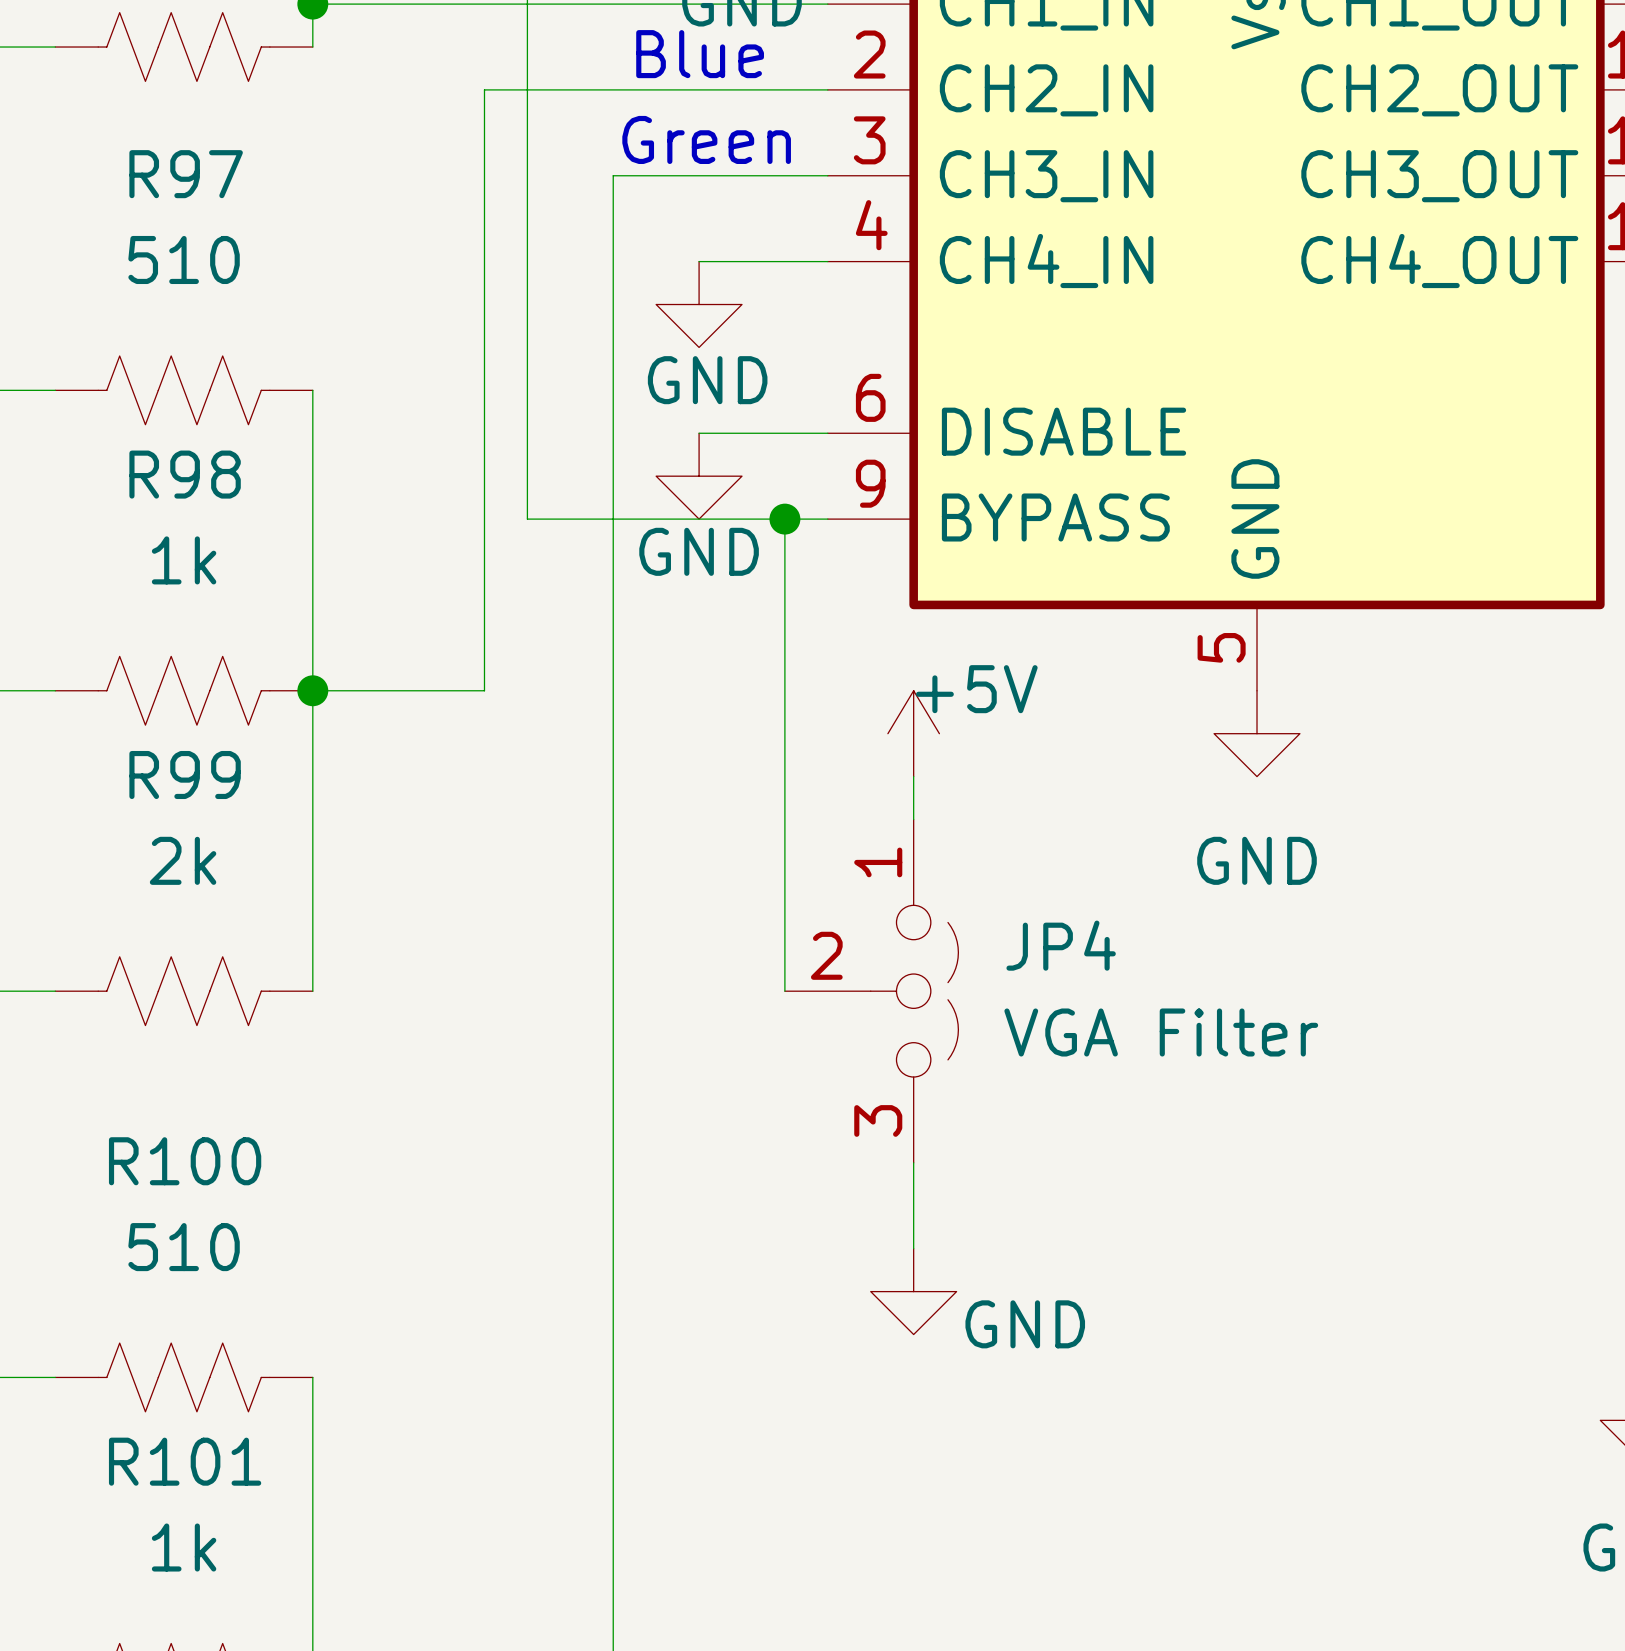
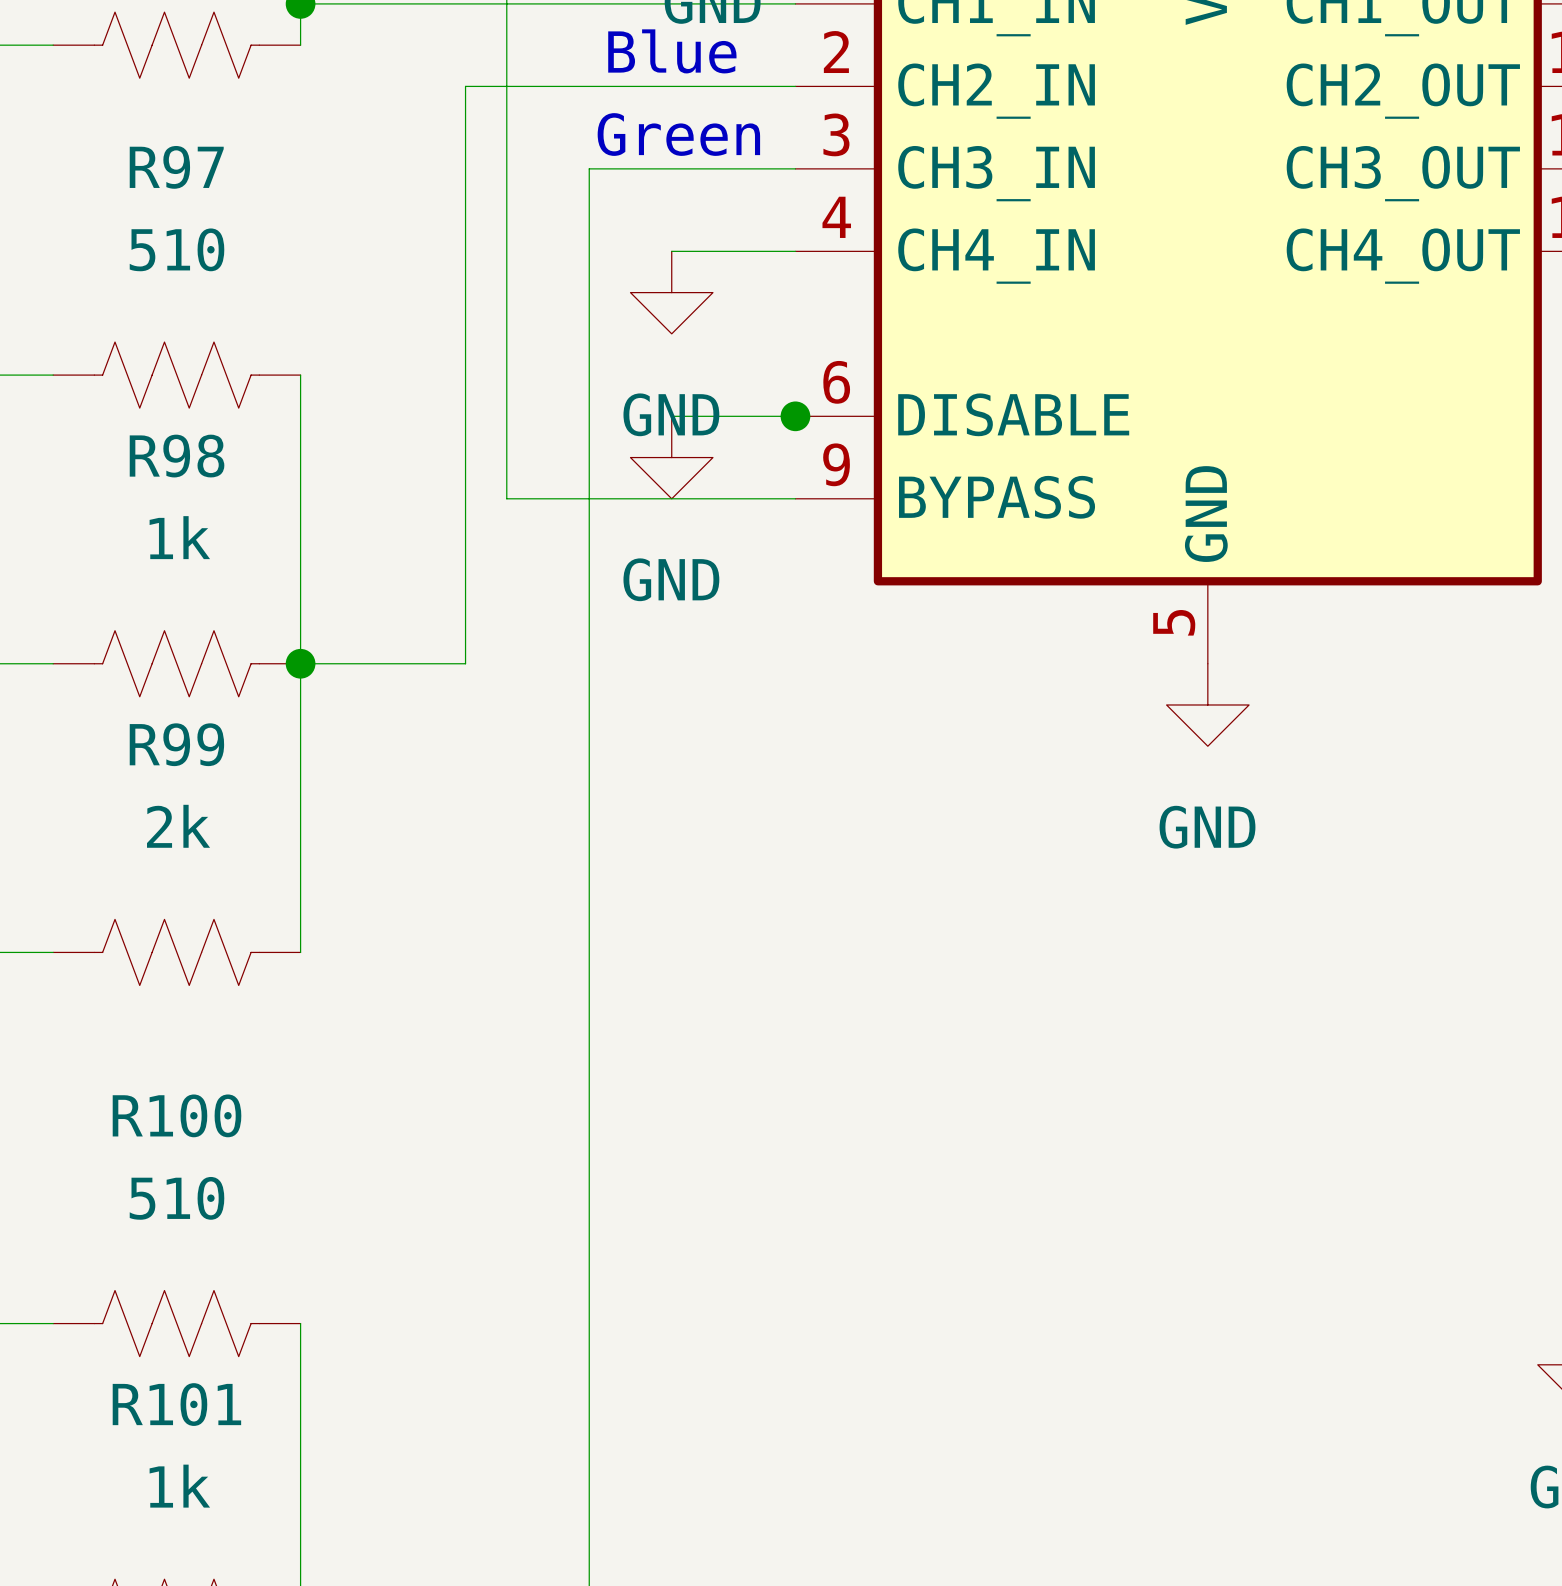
power symbol text position: GND (707, 380) -> GND (671, 414)
wire: (784, 519) (784, 991) -> none
junction position: (784, 519) -> (795, 416)
power symbol text position: GND (699, 551) -> GND (671, 579)
power symbol: +5V (913, 733) -> none
wire: (913, 776) (913, 819) -> none
JP4: VGA Filter (871, 991) -> none
wire: (913, 1162) (913, 1248) -> none
power symbol: GND (913, 1291) -> none

